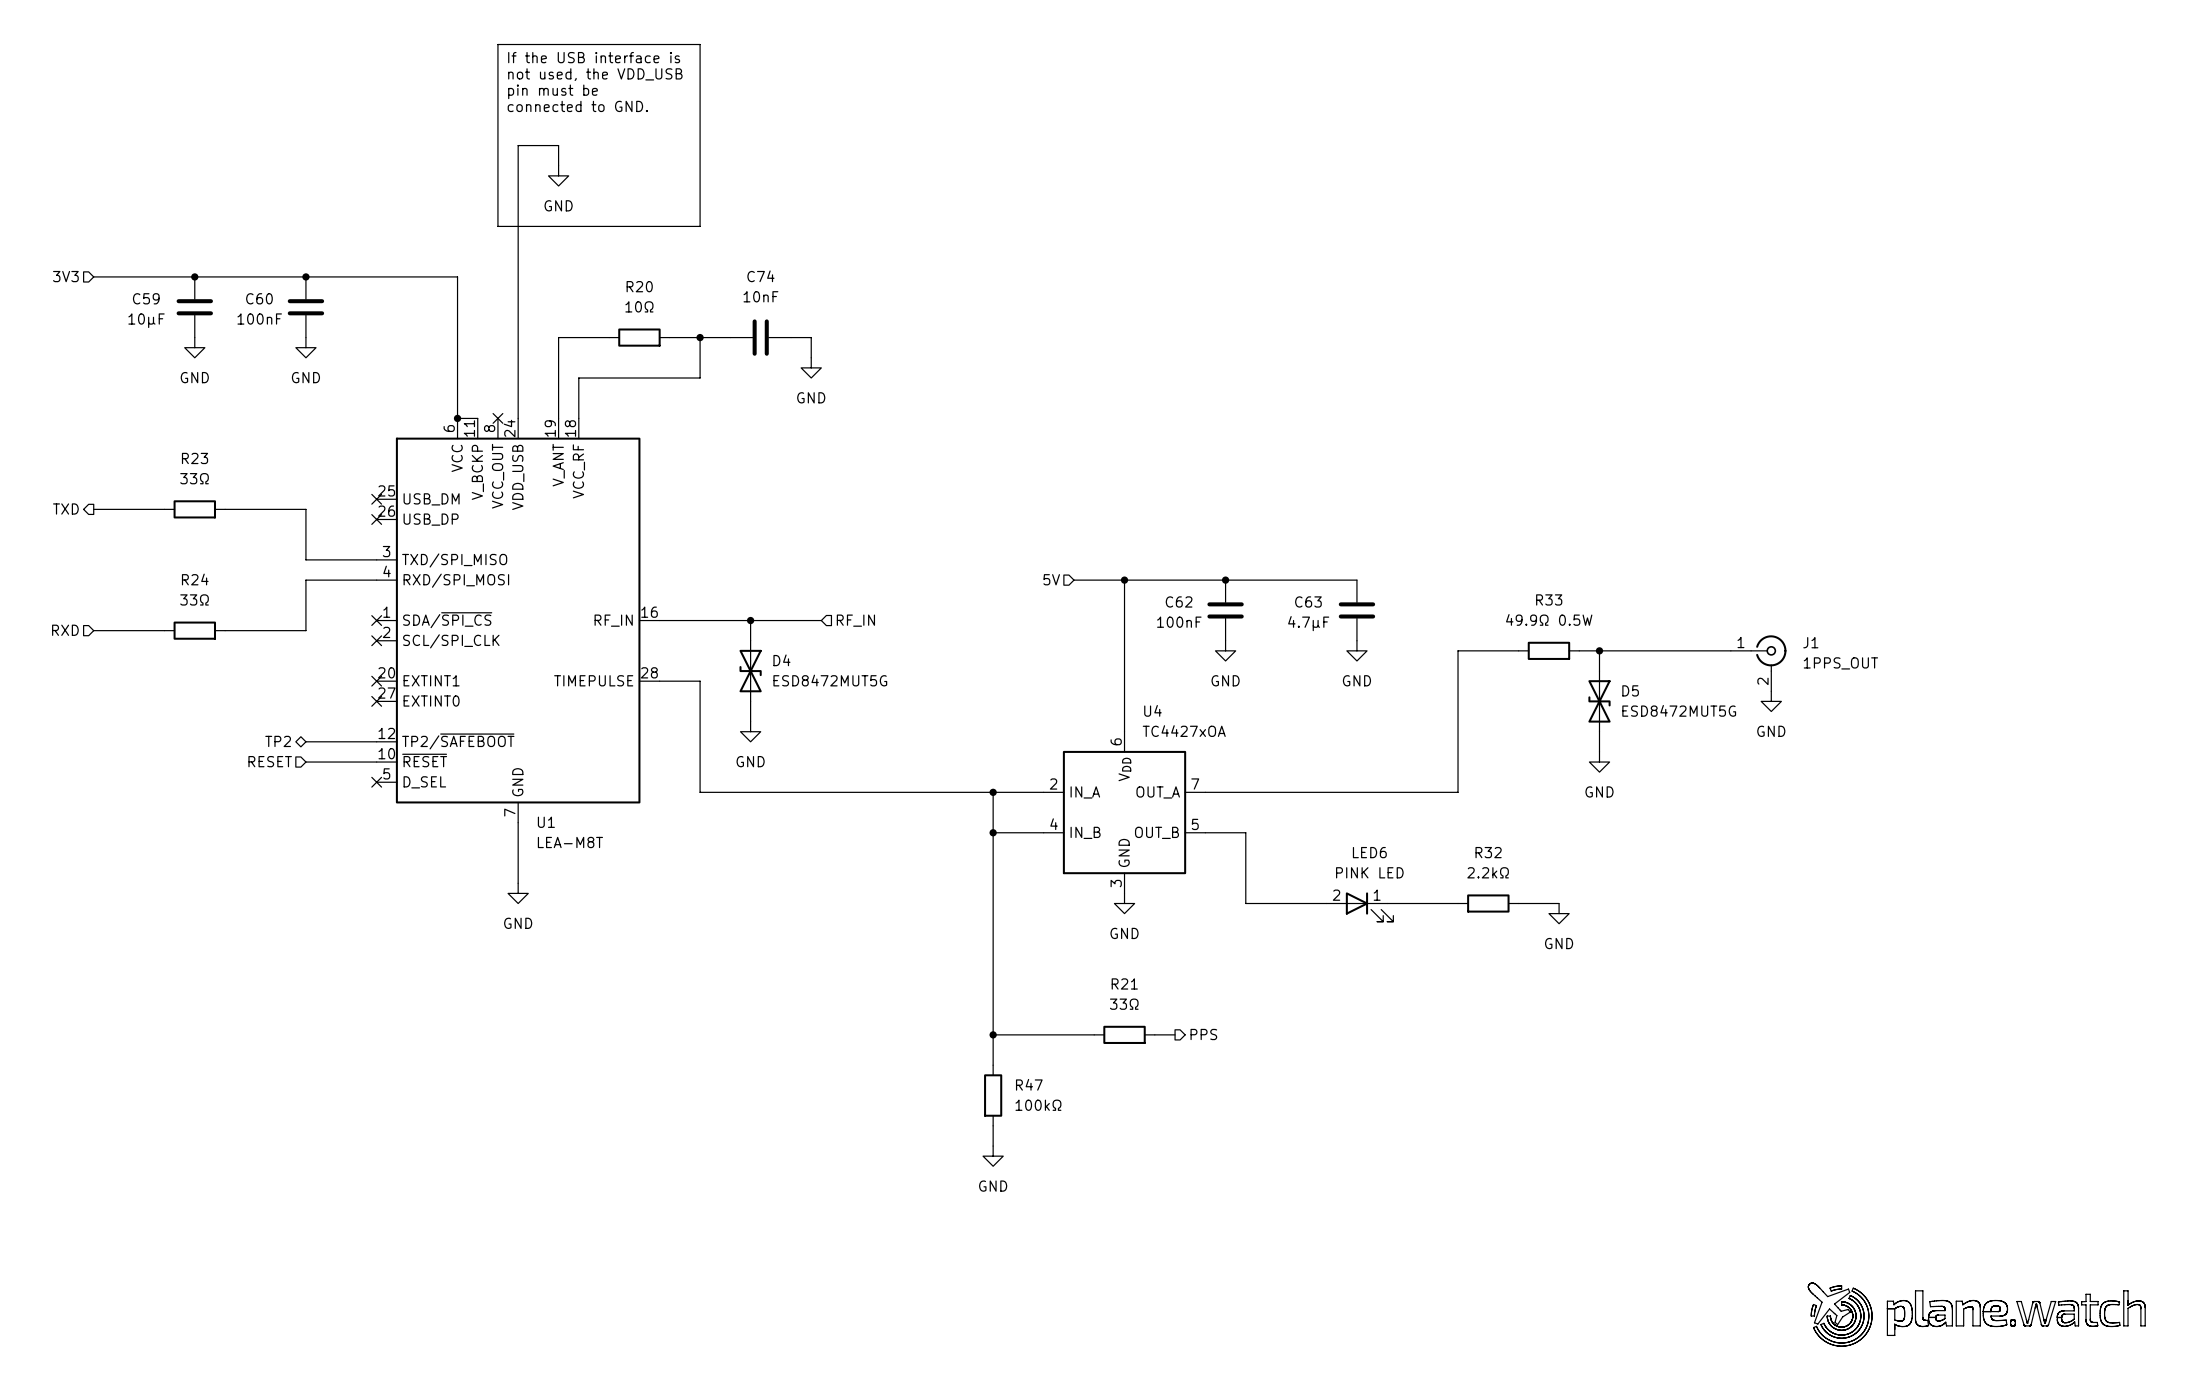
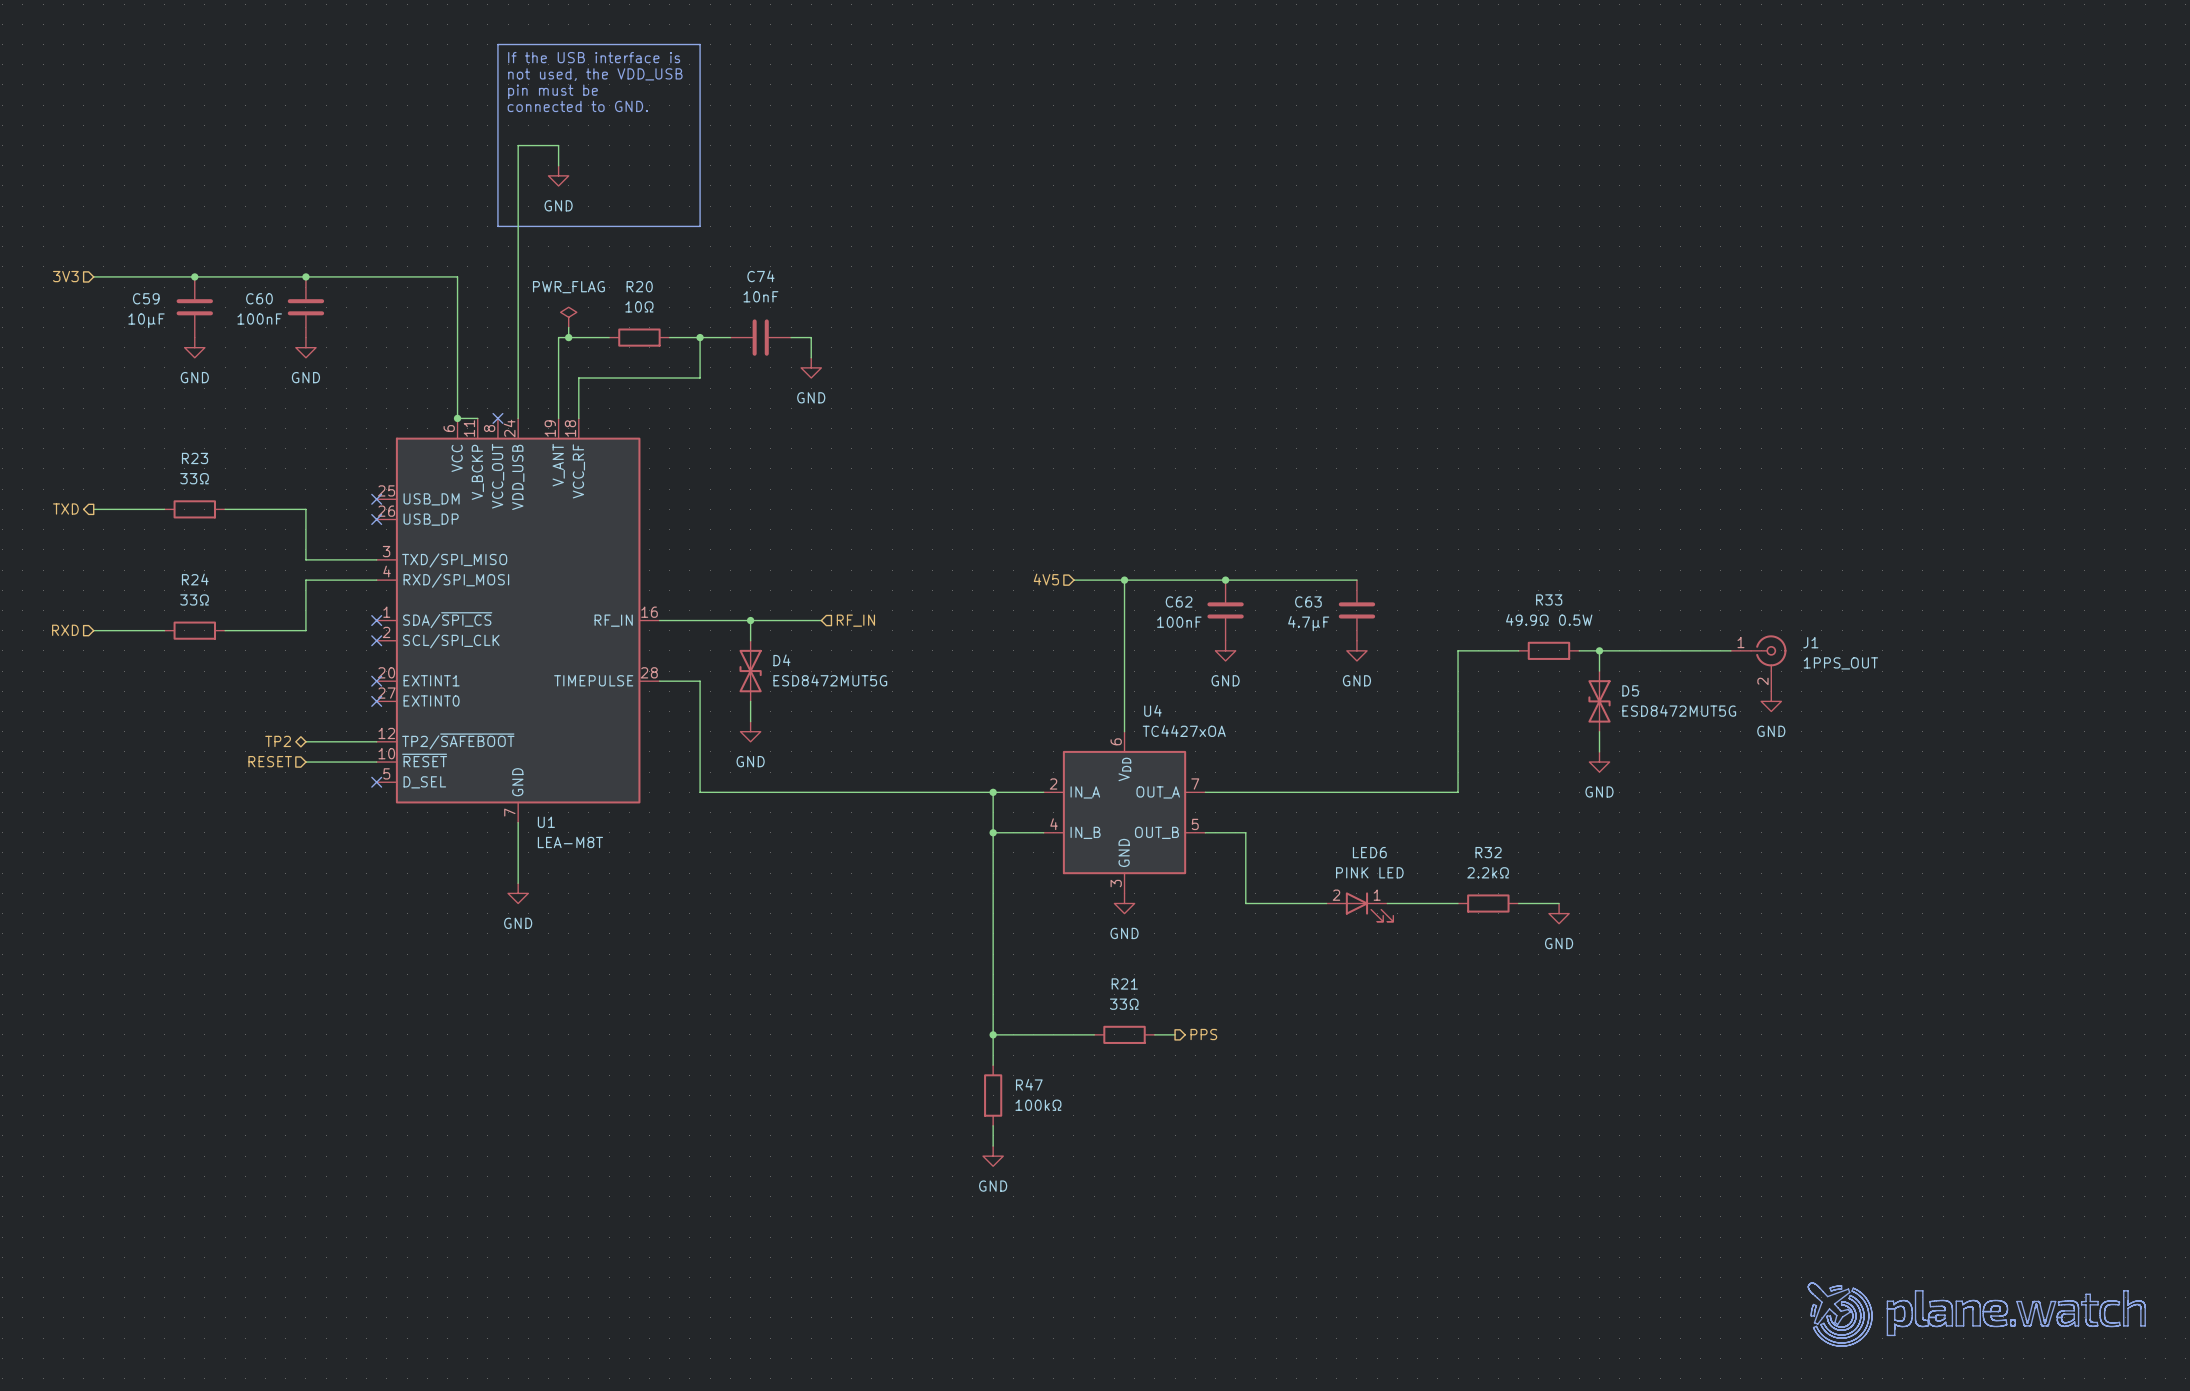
power symbol: none -> PWR_FLAG (568, 317)
wire: none -> (568, 327) (568, 337)
junction: none -> (568, 337)
hierarchical label: 5V (1051, 579) -> 4V5 (1046, 579)

